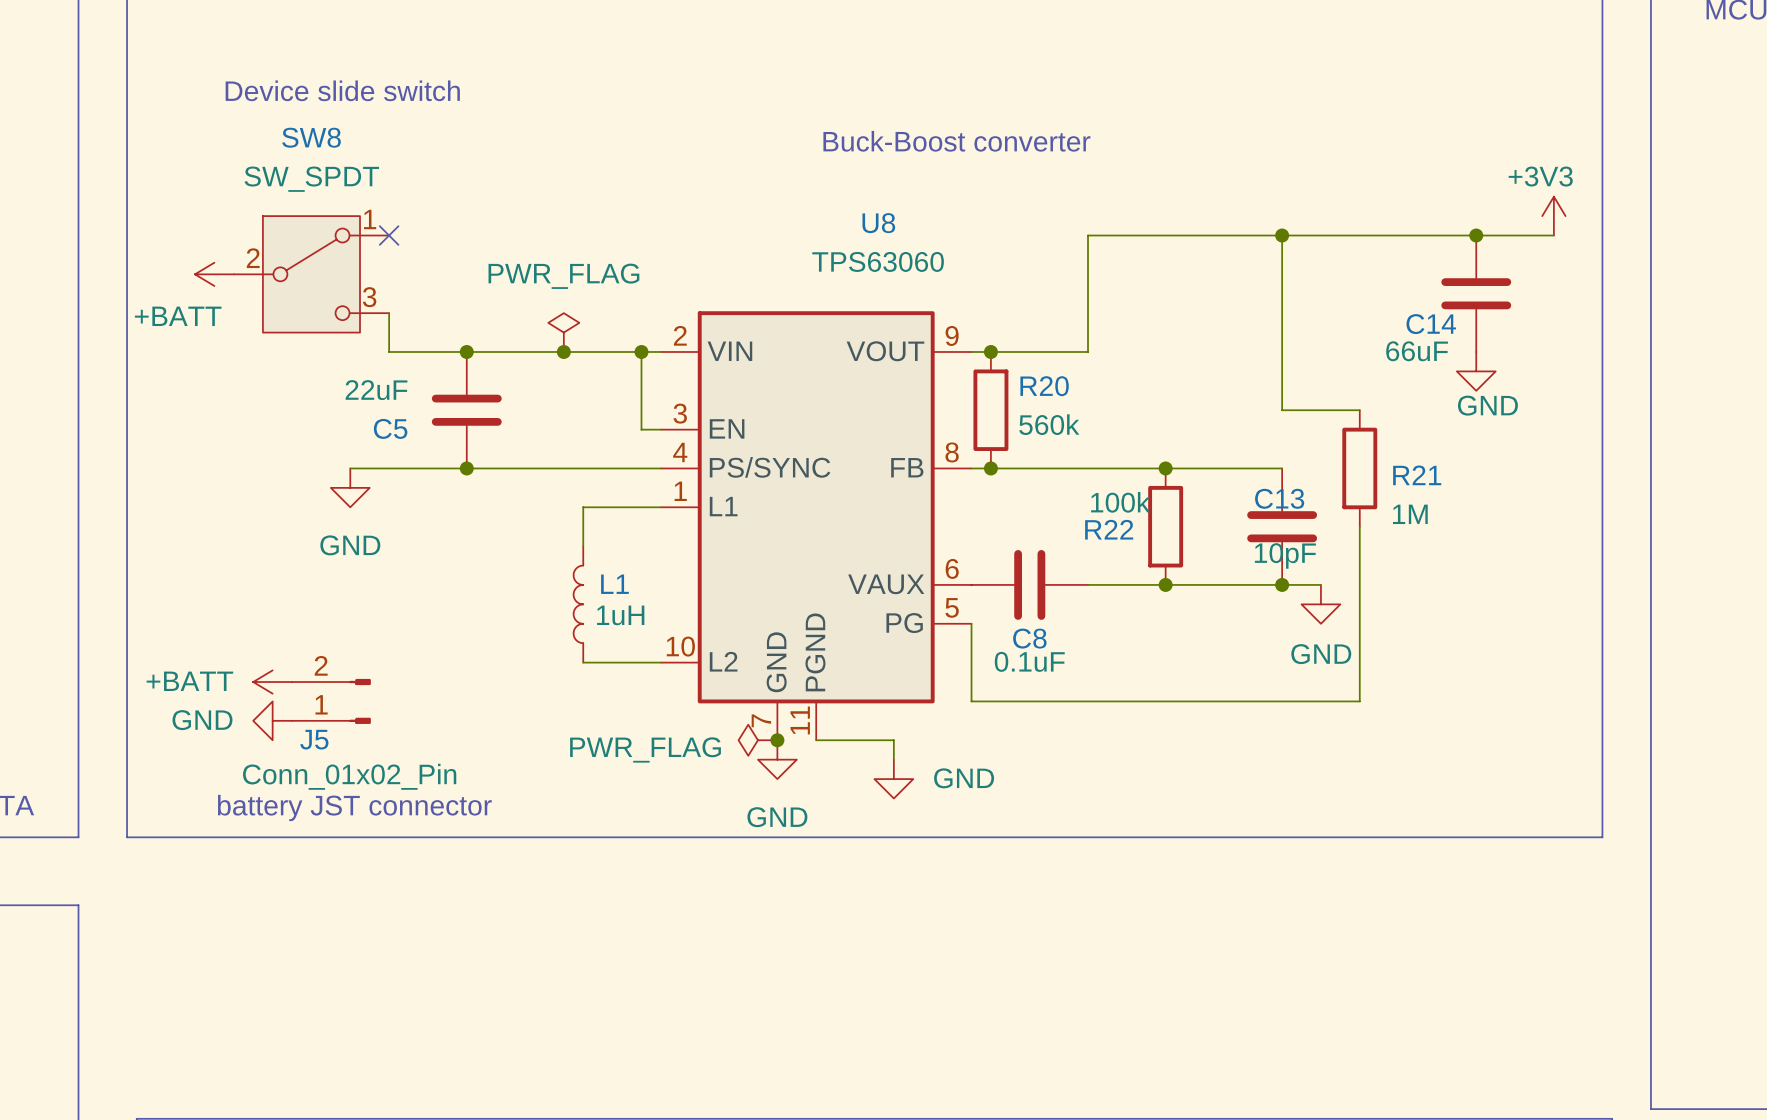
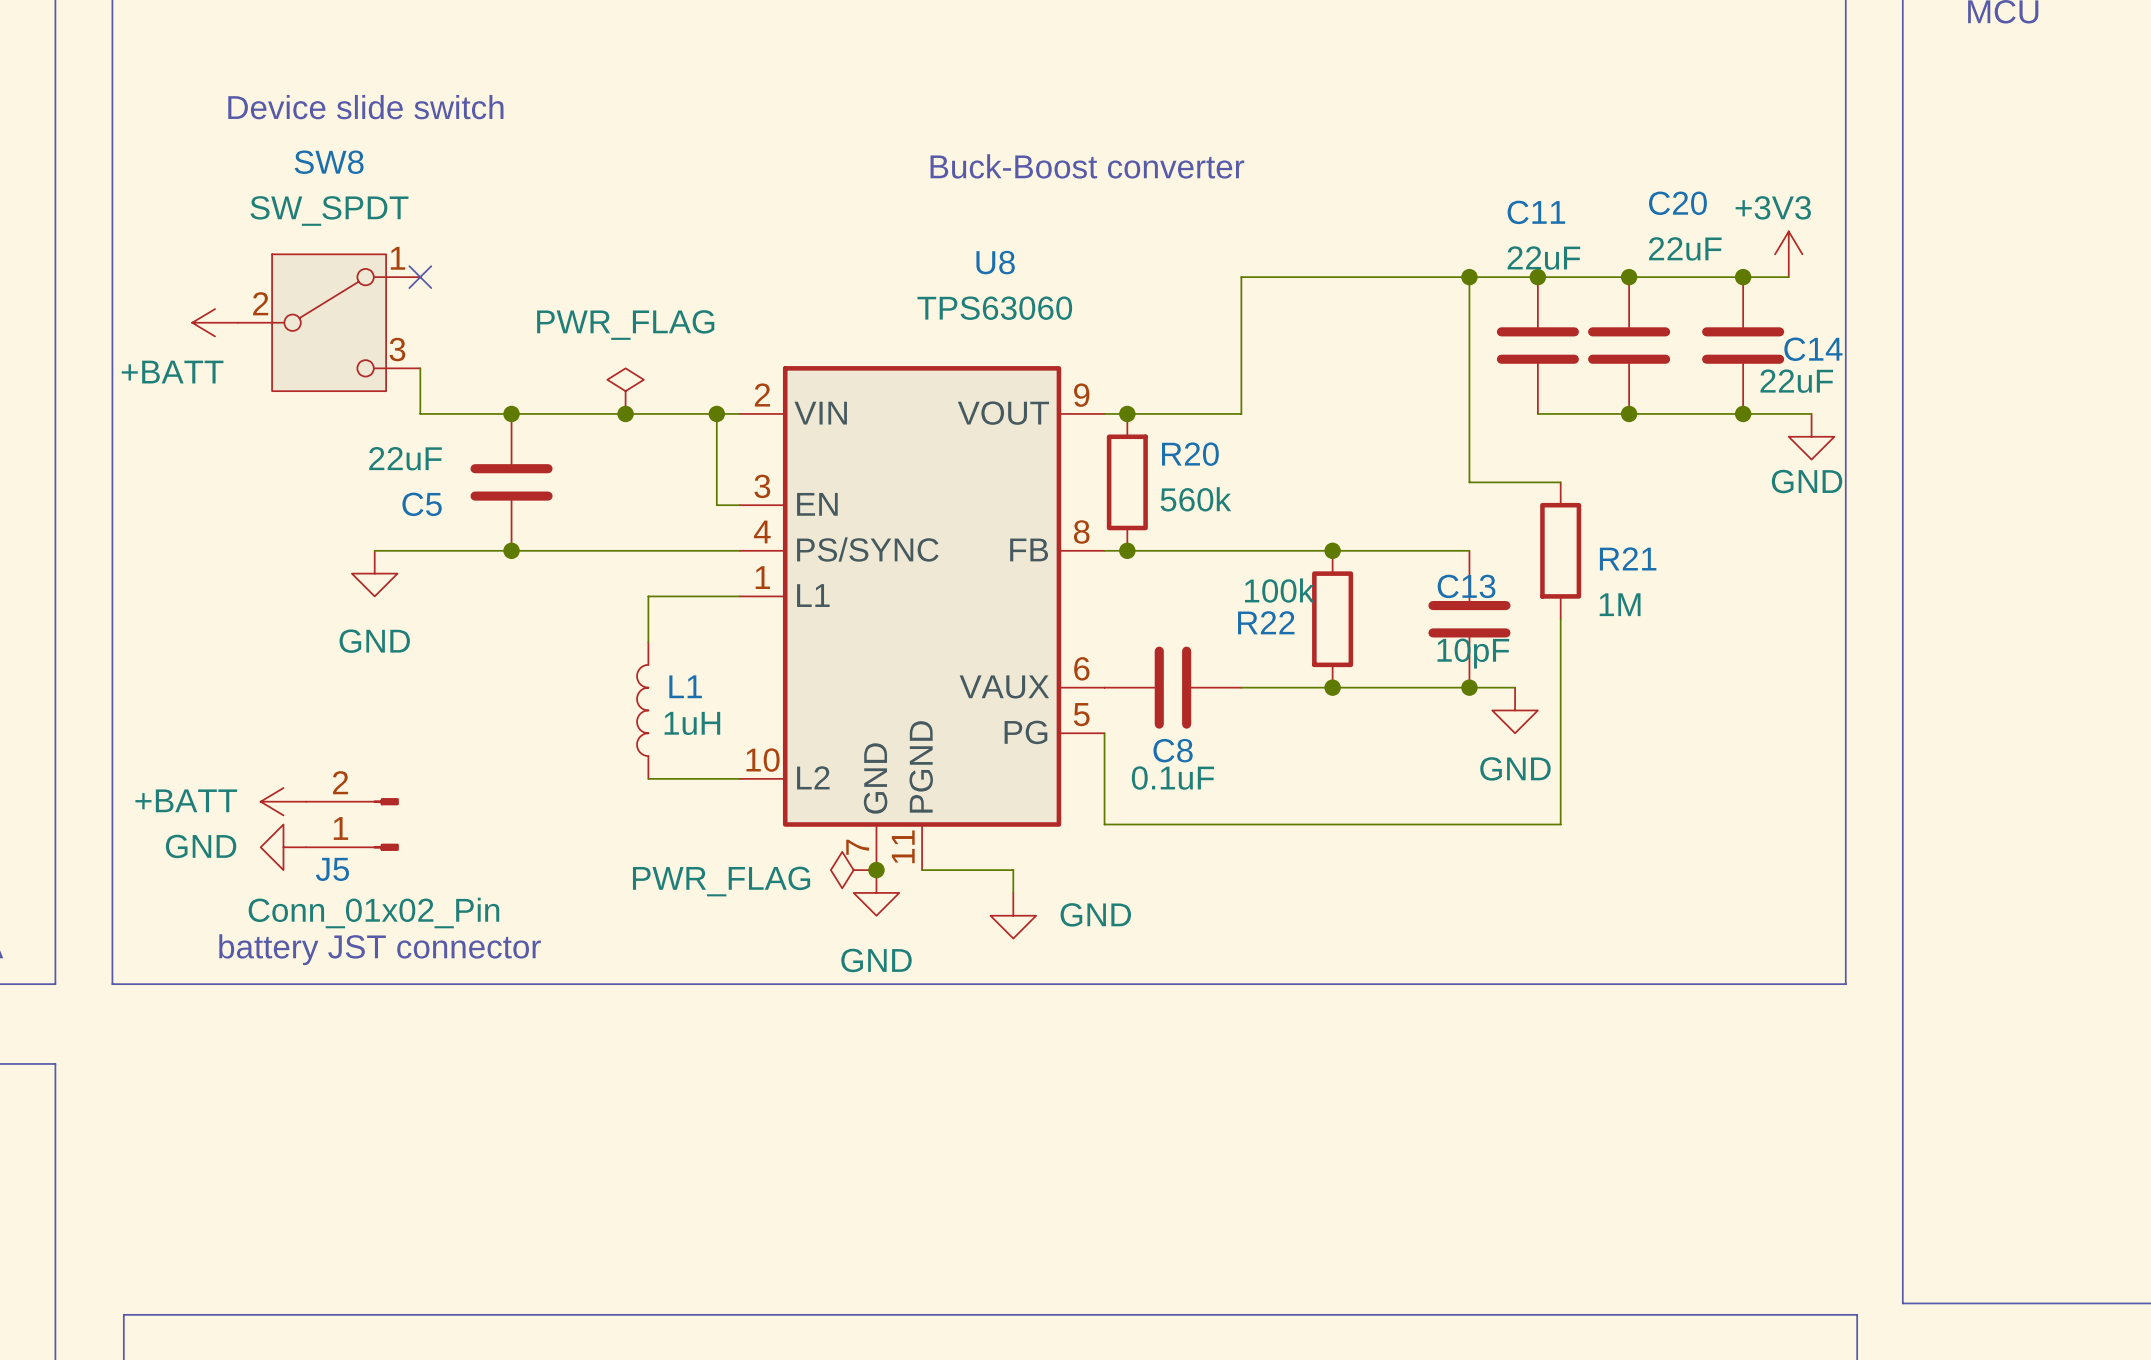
junction: none -> (1537, 277)
junction: none -> (1629, 277)
junction: (1476, 235) -> none
junction: none -> (1743, 277)
C11: none -> 22uF (1537, 345)
C20: none -> 22uF (1629, 345)
C14 position: (1476, 293) -> (1743, 345)
C14 name position: C14 (1431, 324) -> C14 (1813, 349)
wire: none -> (1537, 413) (1811, 413)
C14 value: 66uF (1417, 351) -> 22uF (1796, 381)
junction: none -> (1629, 413)
junction: none -> (1743, 413)
power symbol position: GND (1476, 371) -> GND (1811, 436)
power symbol text position: GND (1487, 405) -> GND (1807, 481)

